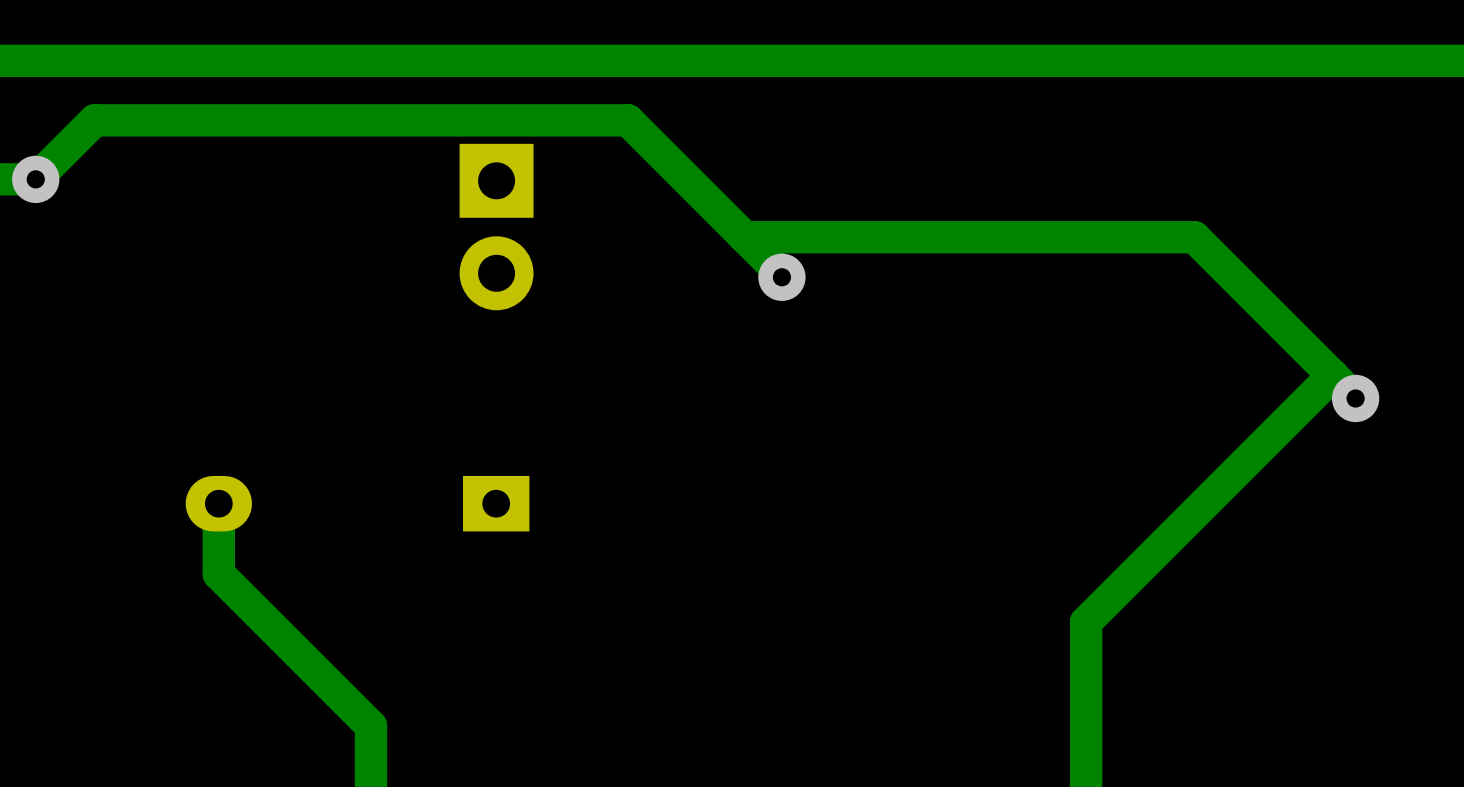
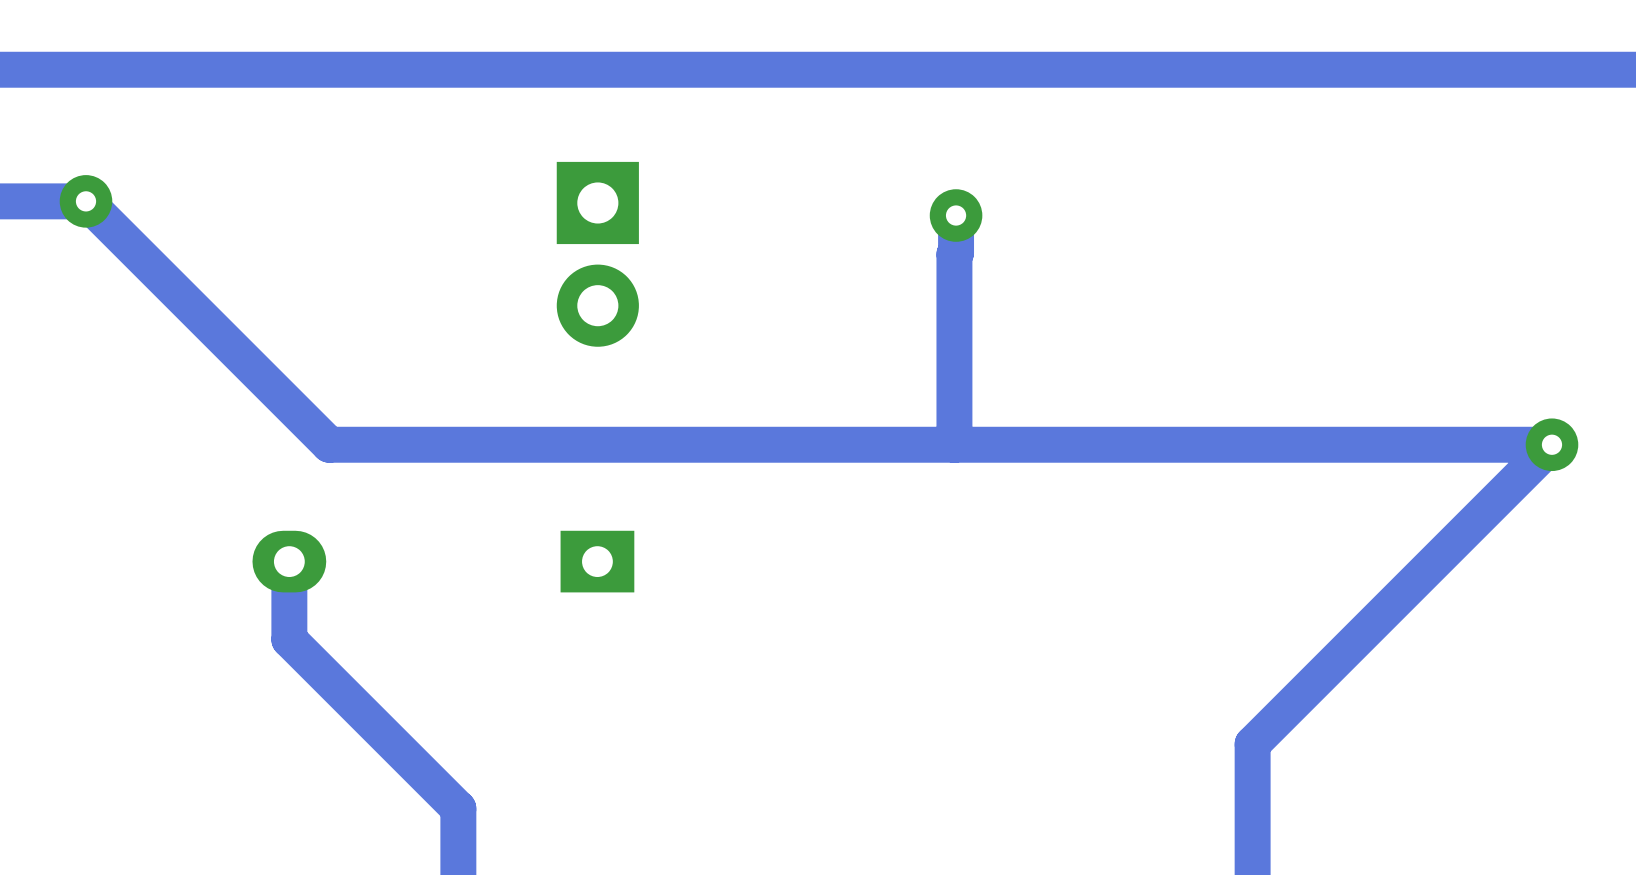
track: (35, 179) (94, 120) (627, 120) (781, 274) (781, 277) -> (86, 201) (329, 444) (1551, 444) (1252, 744)
track: none -> (956, 215) (954, 444)
track: (744, 237) (1194, 237) (1355, 398) -> none
via position: (781, 277) -> (956, 215)
track: (1332, 375) (1086, 622) (1086, 668) -> none

